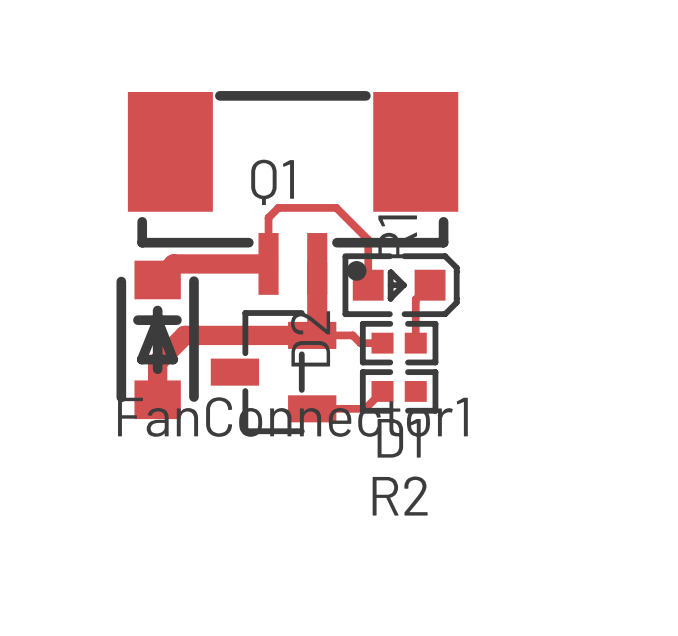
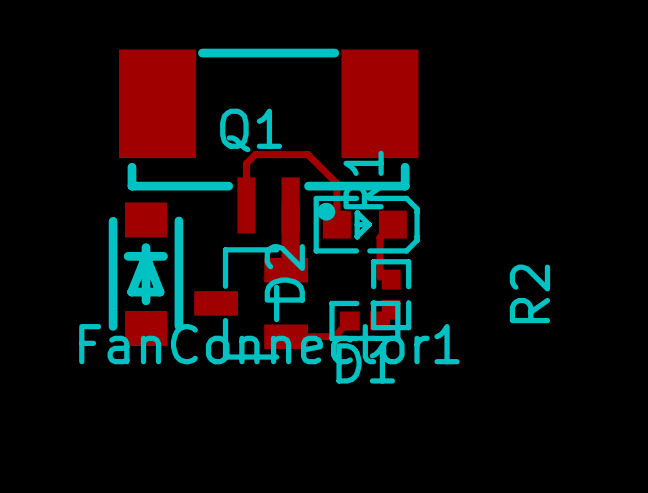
top track: (268, 263) (173, 263) (157, 279) -> none
top track: (382, 343) (360, 343) (352, 335) (184, 335) (157, 362) (157, 399) -> none
R2 rotation: 0° (399, 343) -> 90° clockwise (391, 294)
R2 name position: R2 (400, 496) -> R2 (529, 293)

